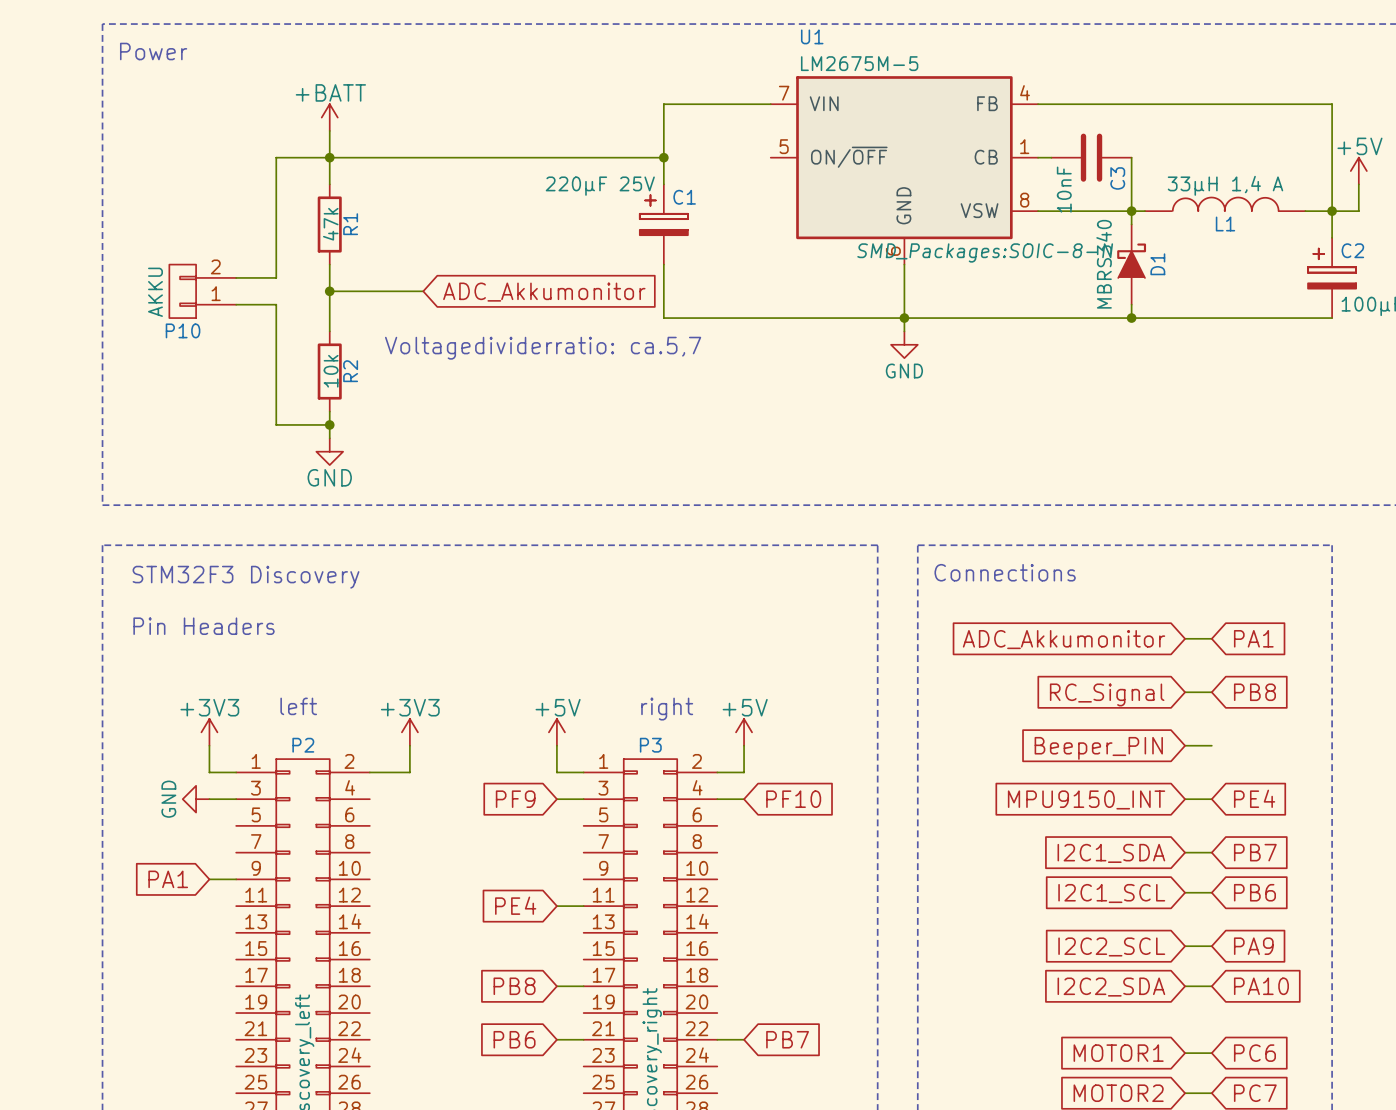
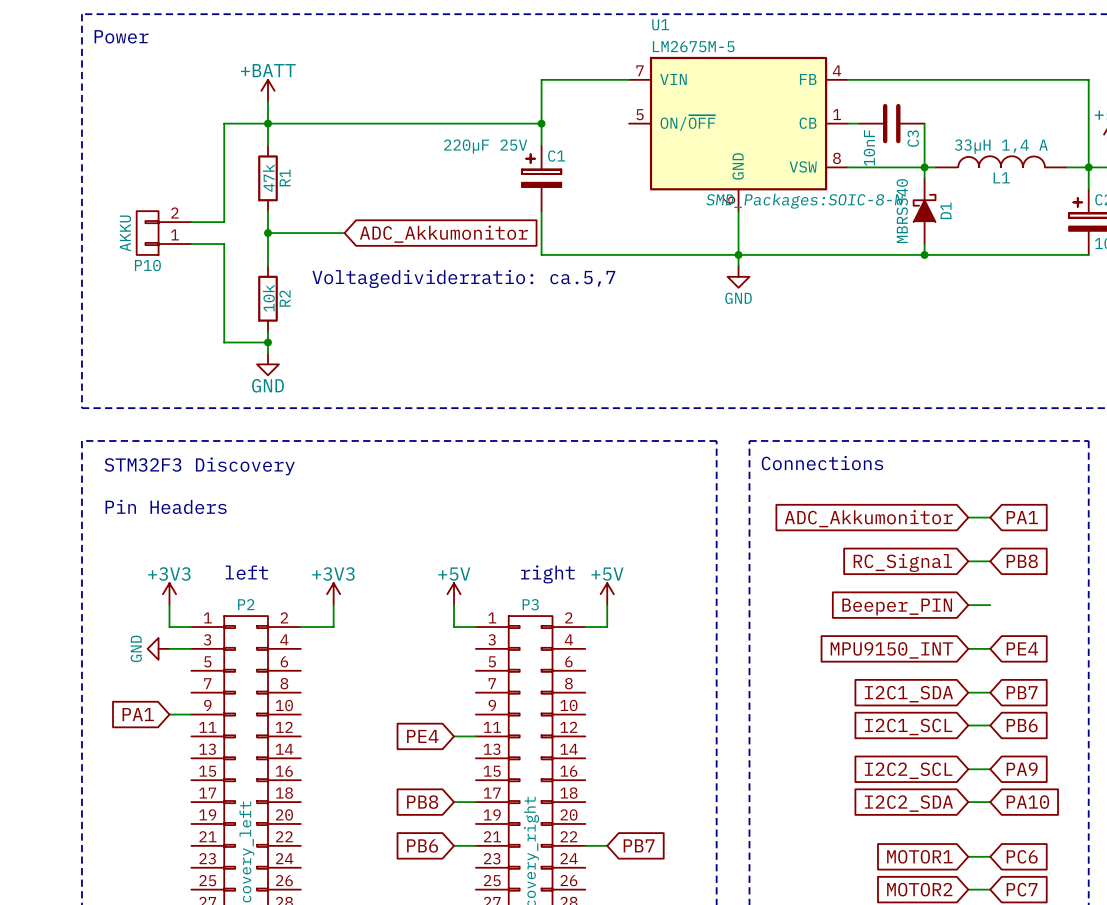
global label: PF9 (515, 799) -> none
wire: (556, 799) (583, 799) -> none
wire: (717, 799) (744, 799) -> none
global label: PF10 (793, 799) -> none

